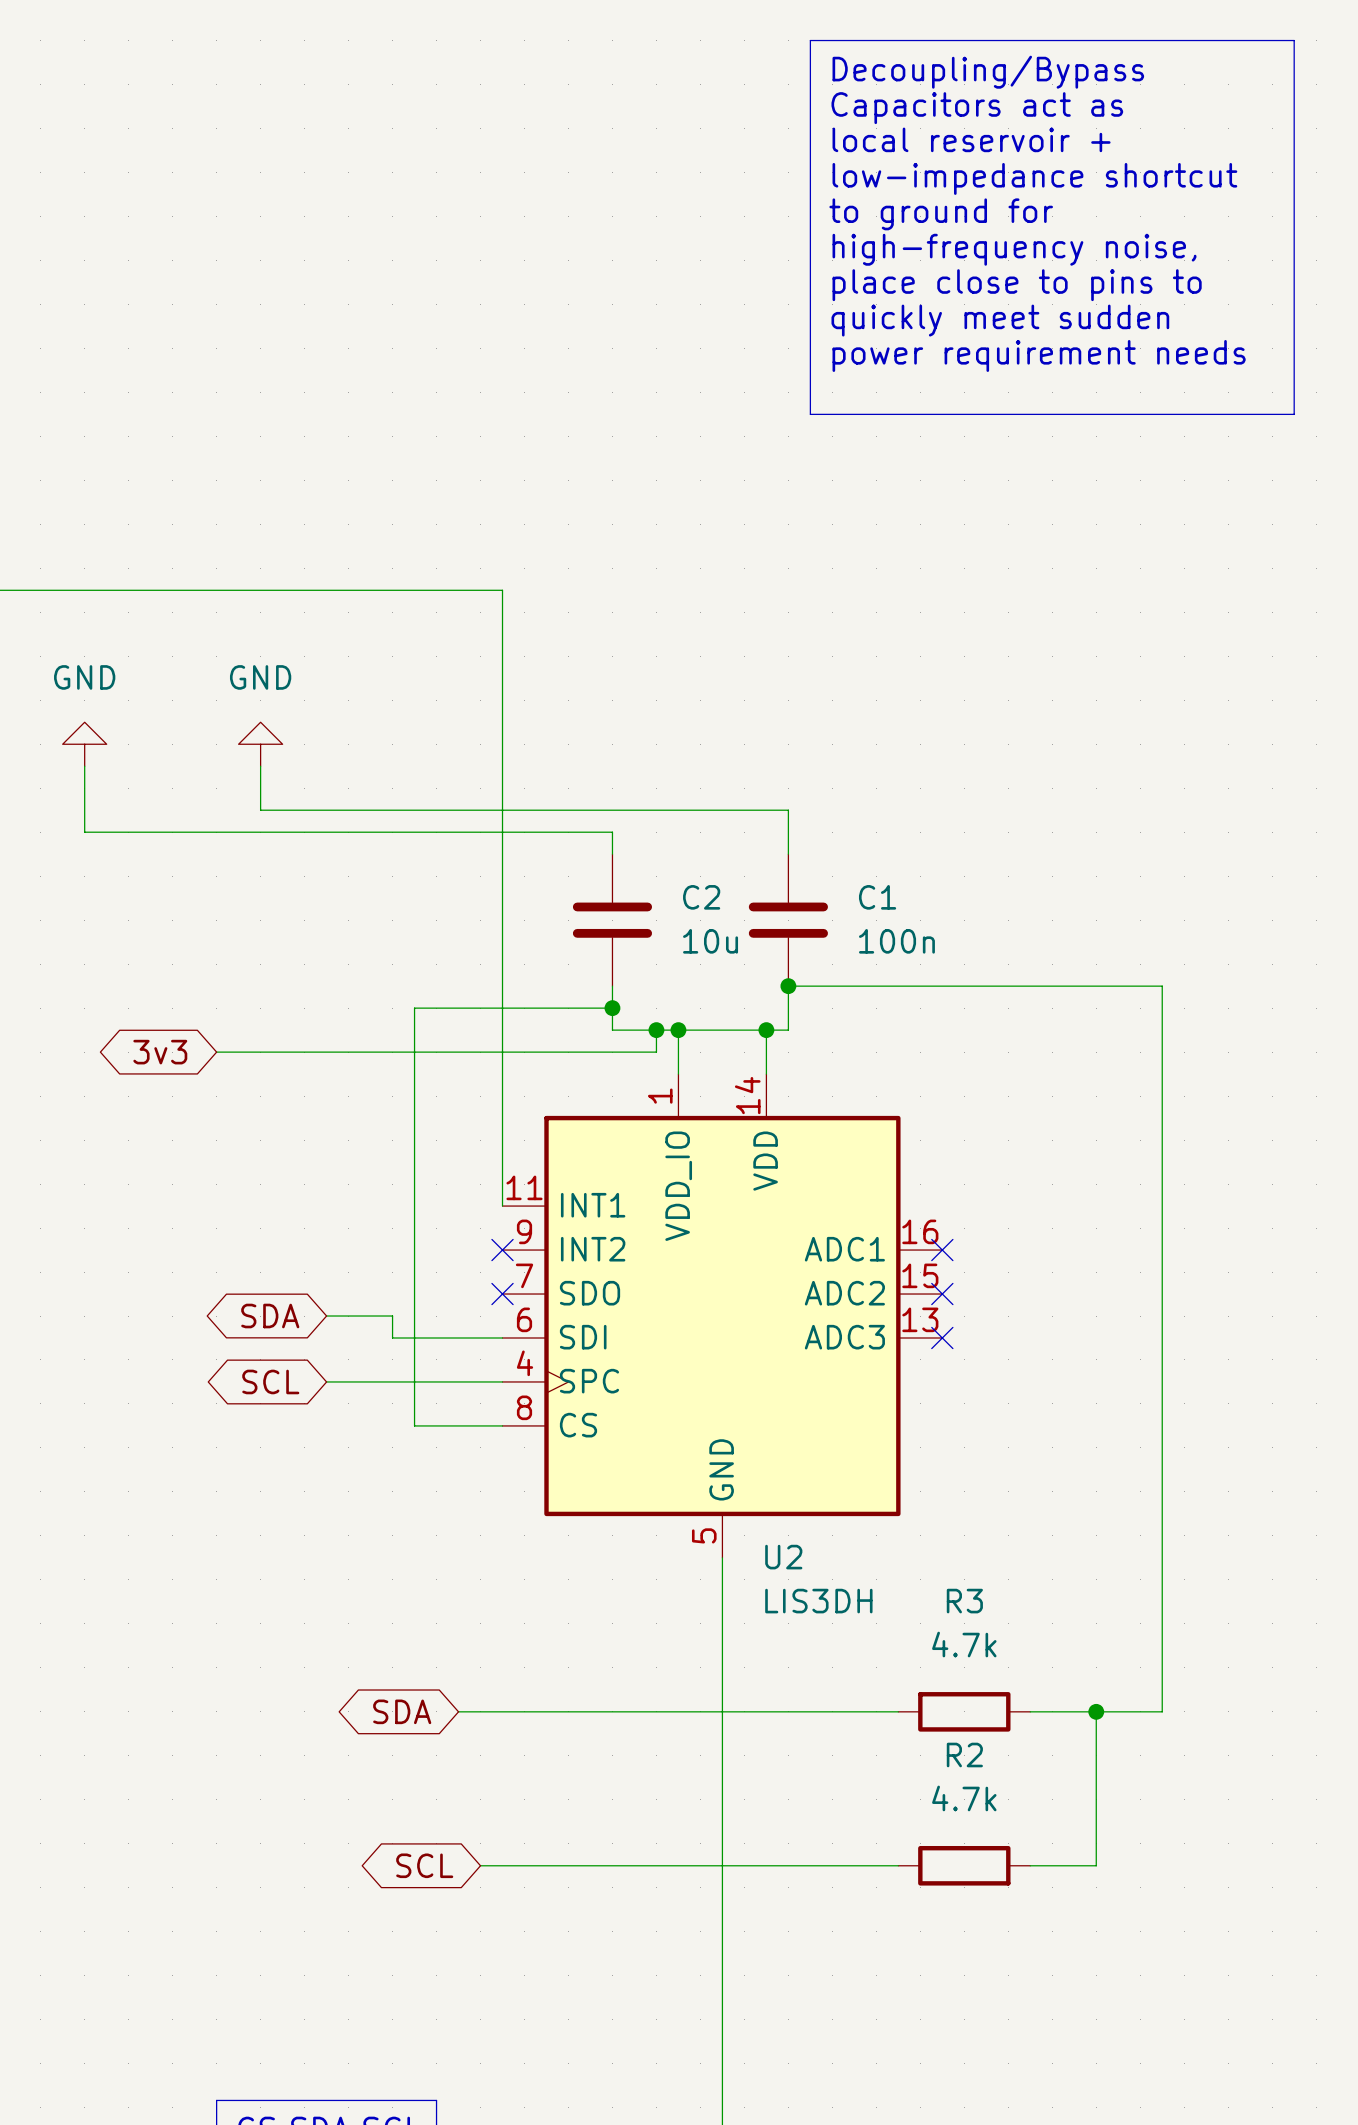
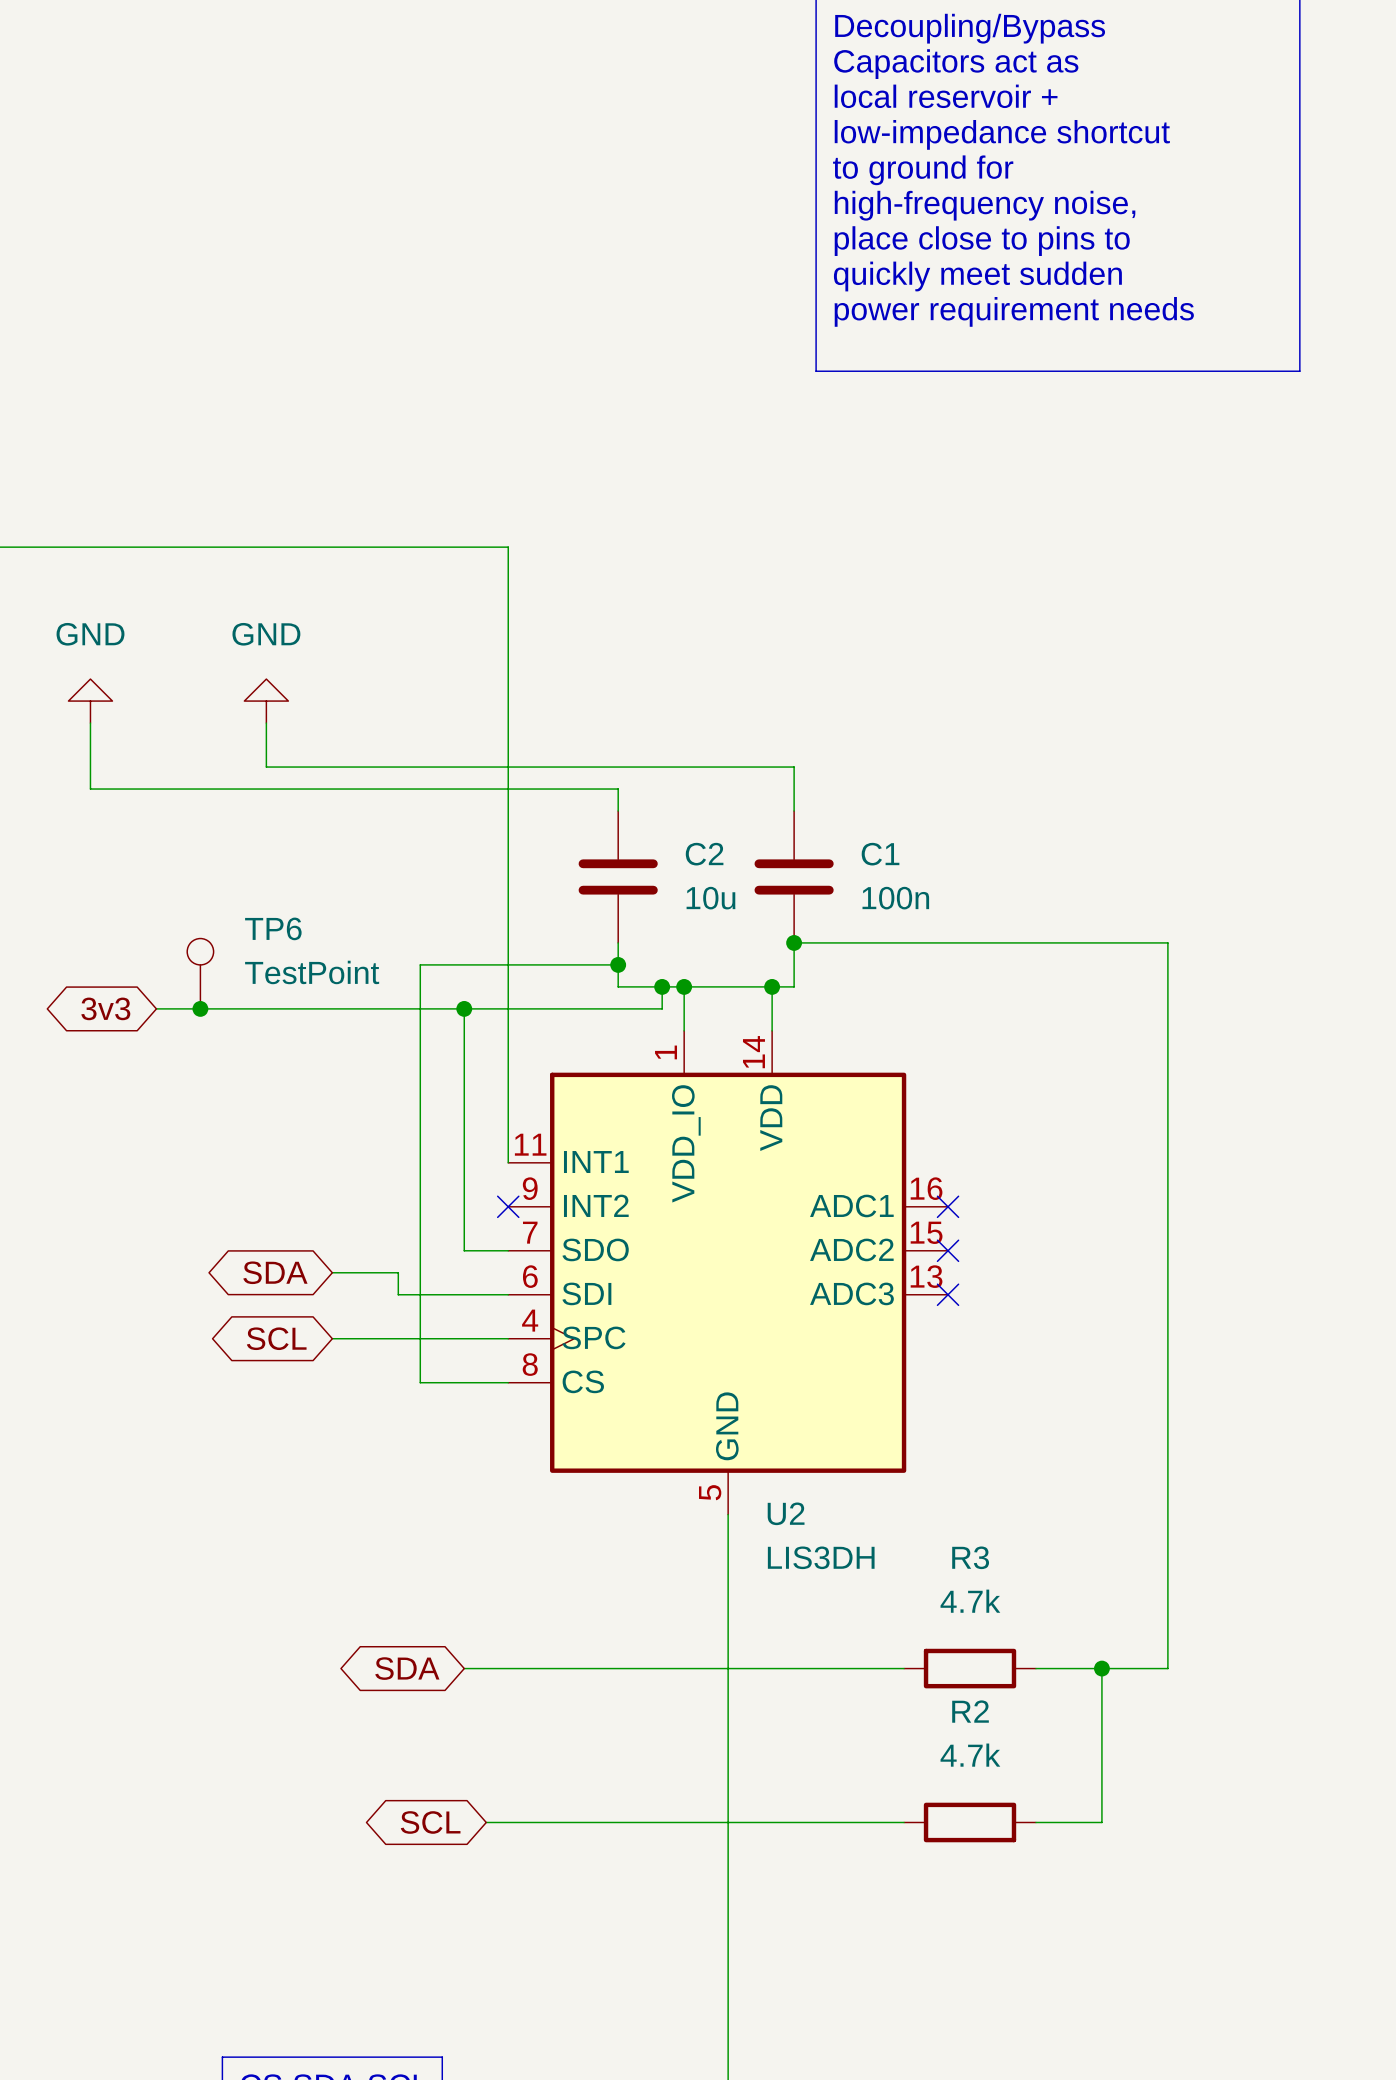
TP6: none -> TestPoint (200, 973)
wire: none -> (156, 1008) (222, 1008)
global label position: 3v3 (160, 1052) -> 3v3 (105, 1008)
junction: none -> (200, 1008)
wire: none -> (464, 1008) (464, 1250) (508, 1250)
junction: none -> (464, 1008)
no-connect mark: (502, 1294) -> none

